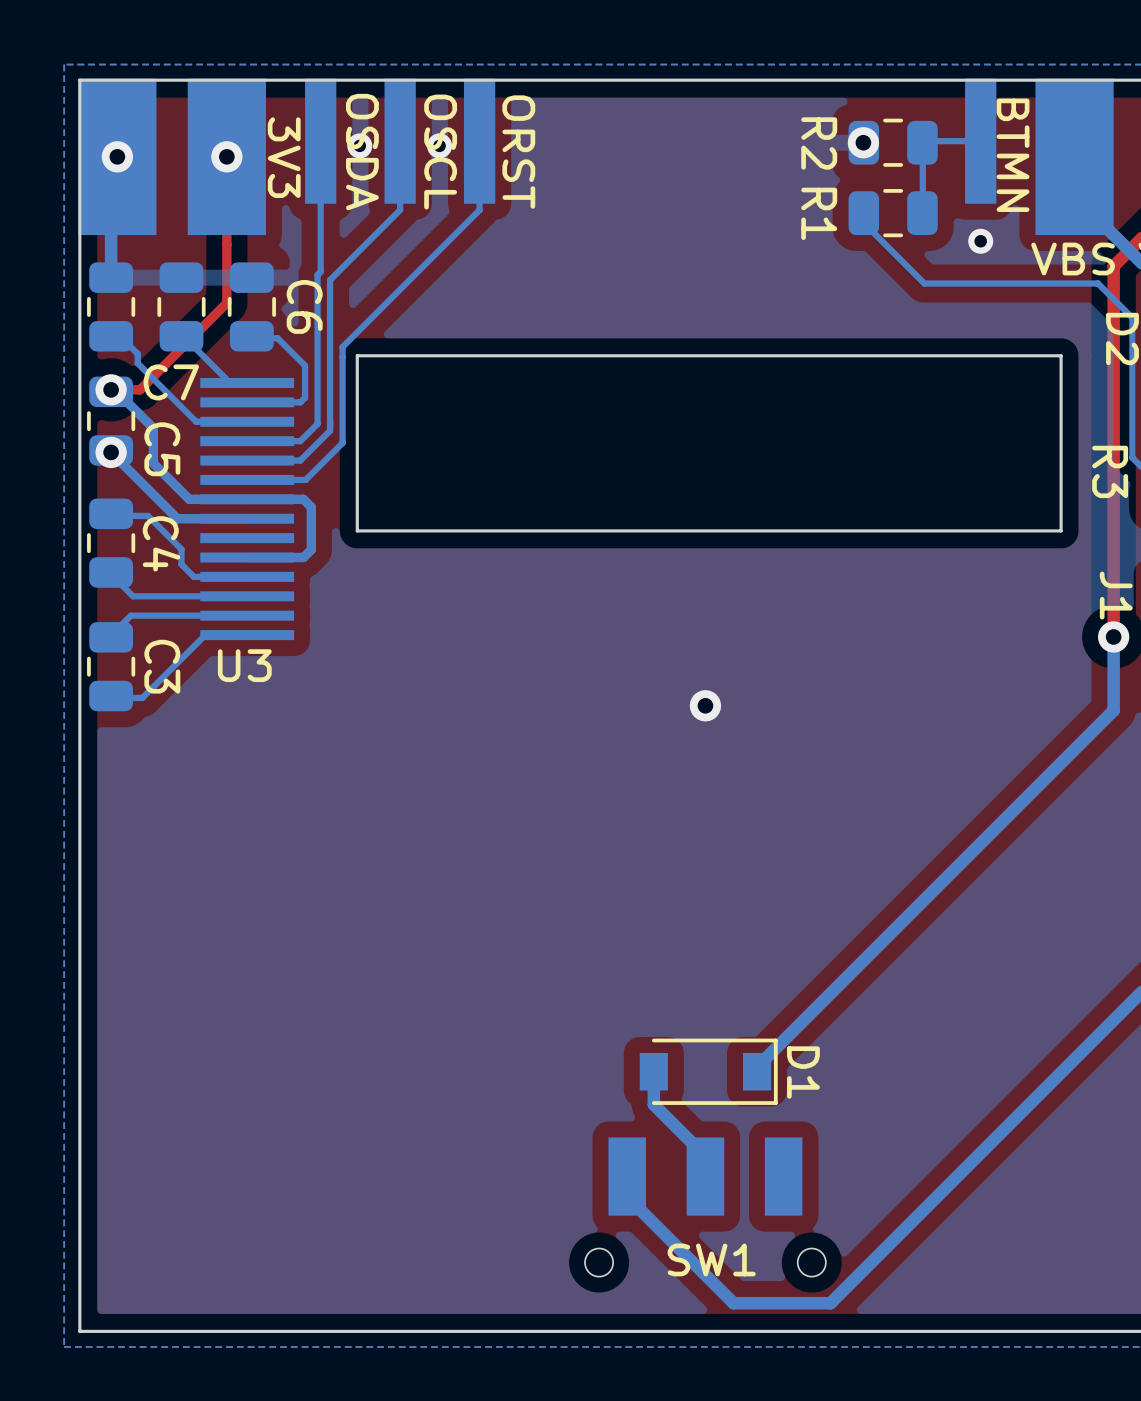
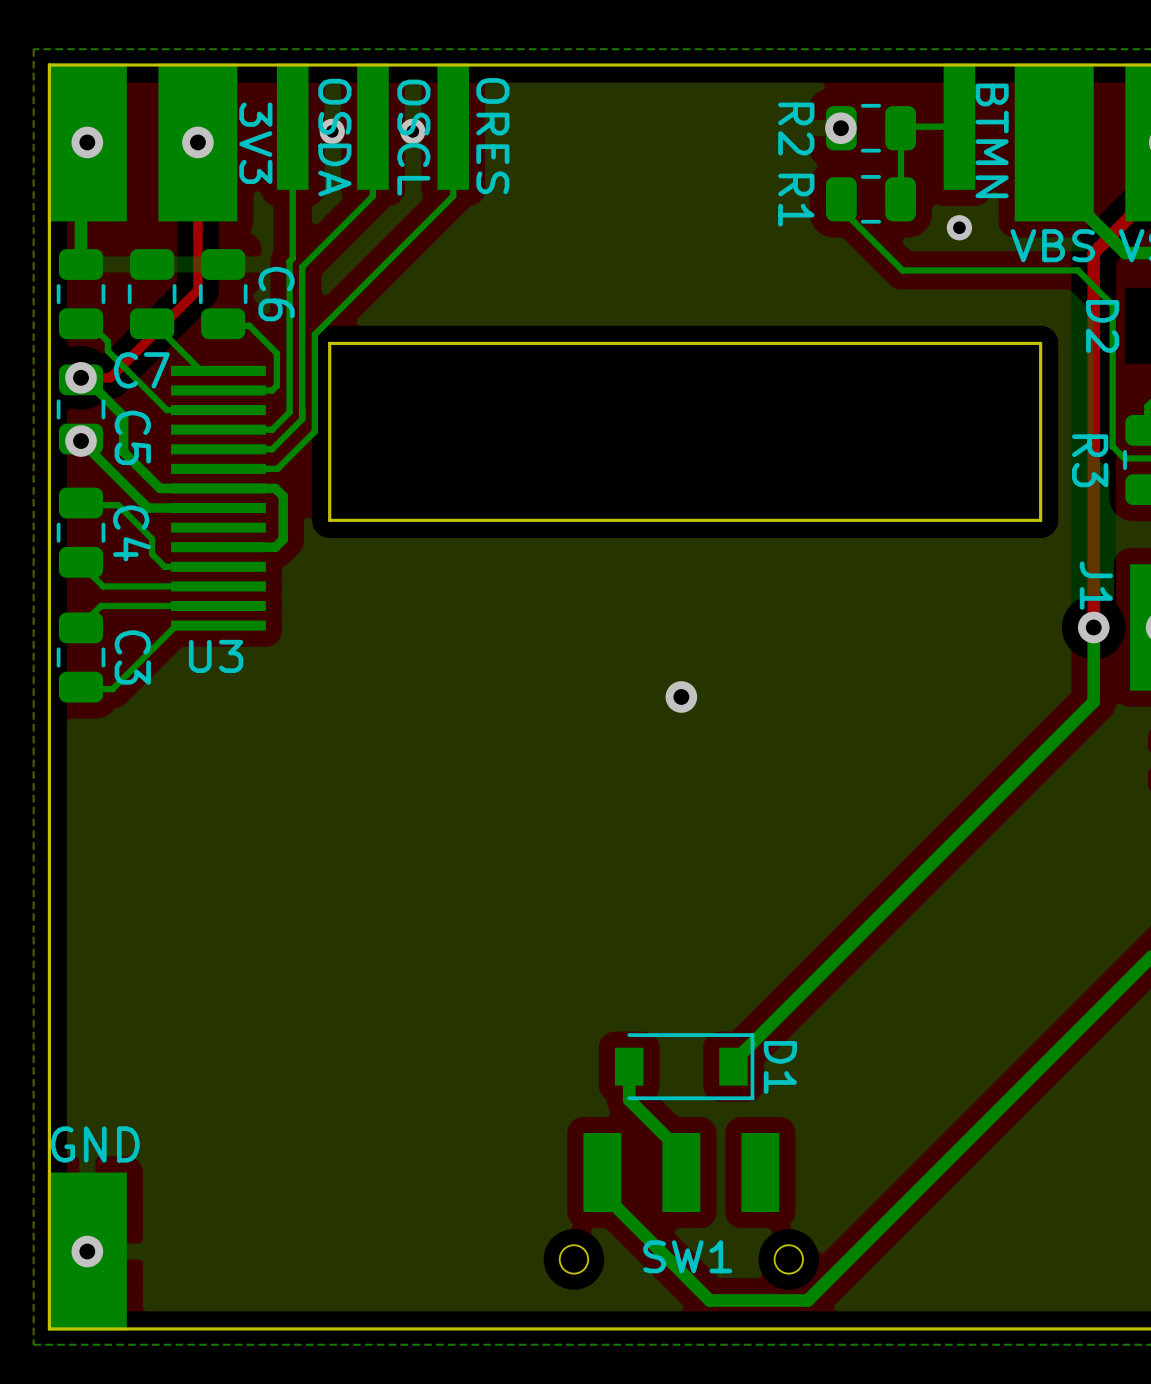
part value: ORST (518, 152) -> ORES (492, 136)
part: none -> GND (87, 1251)
via: none -> (87, 1251)

